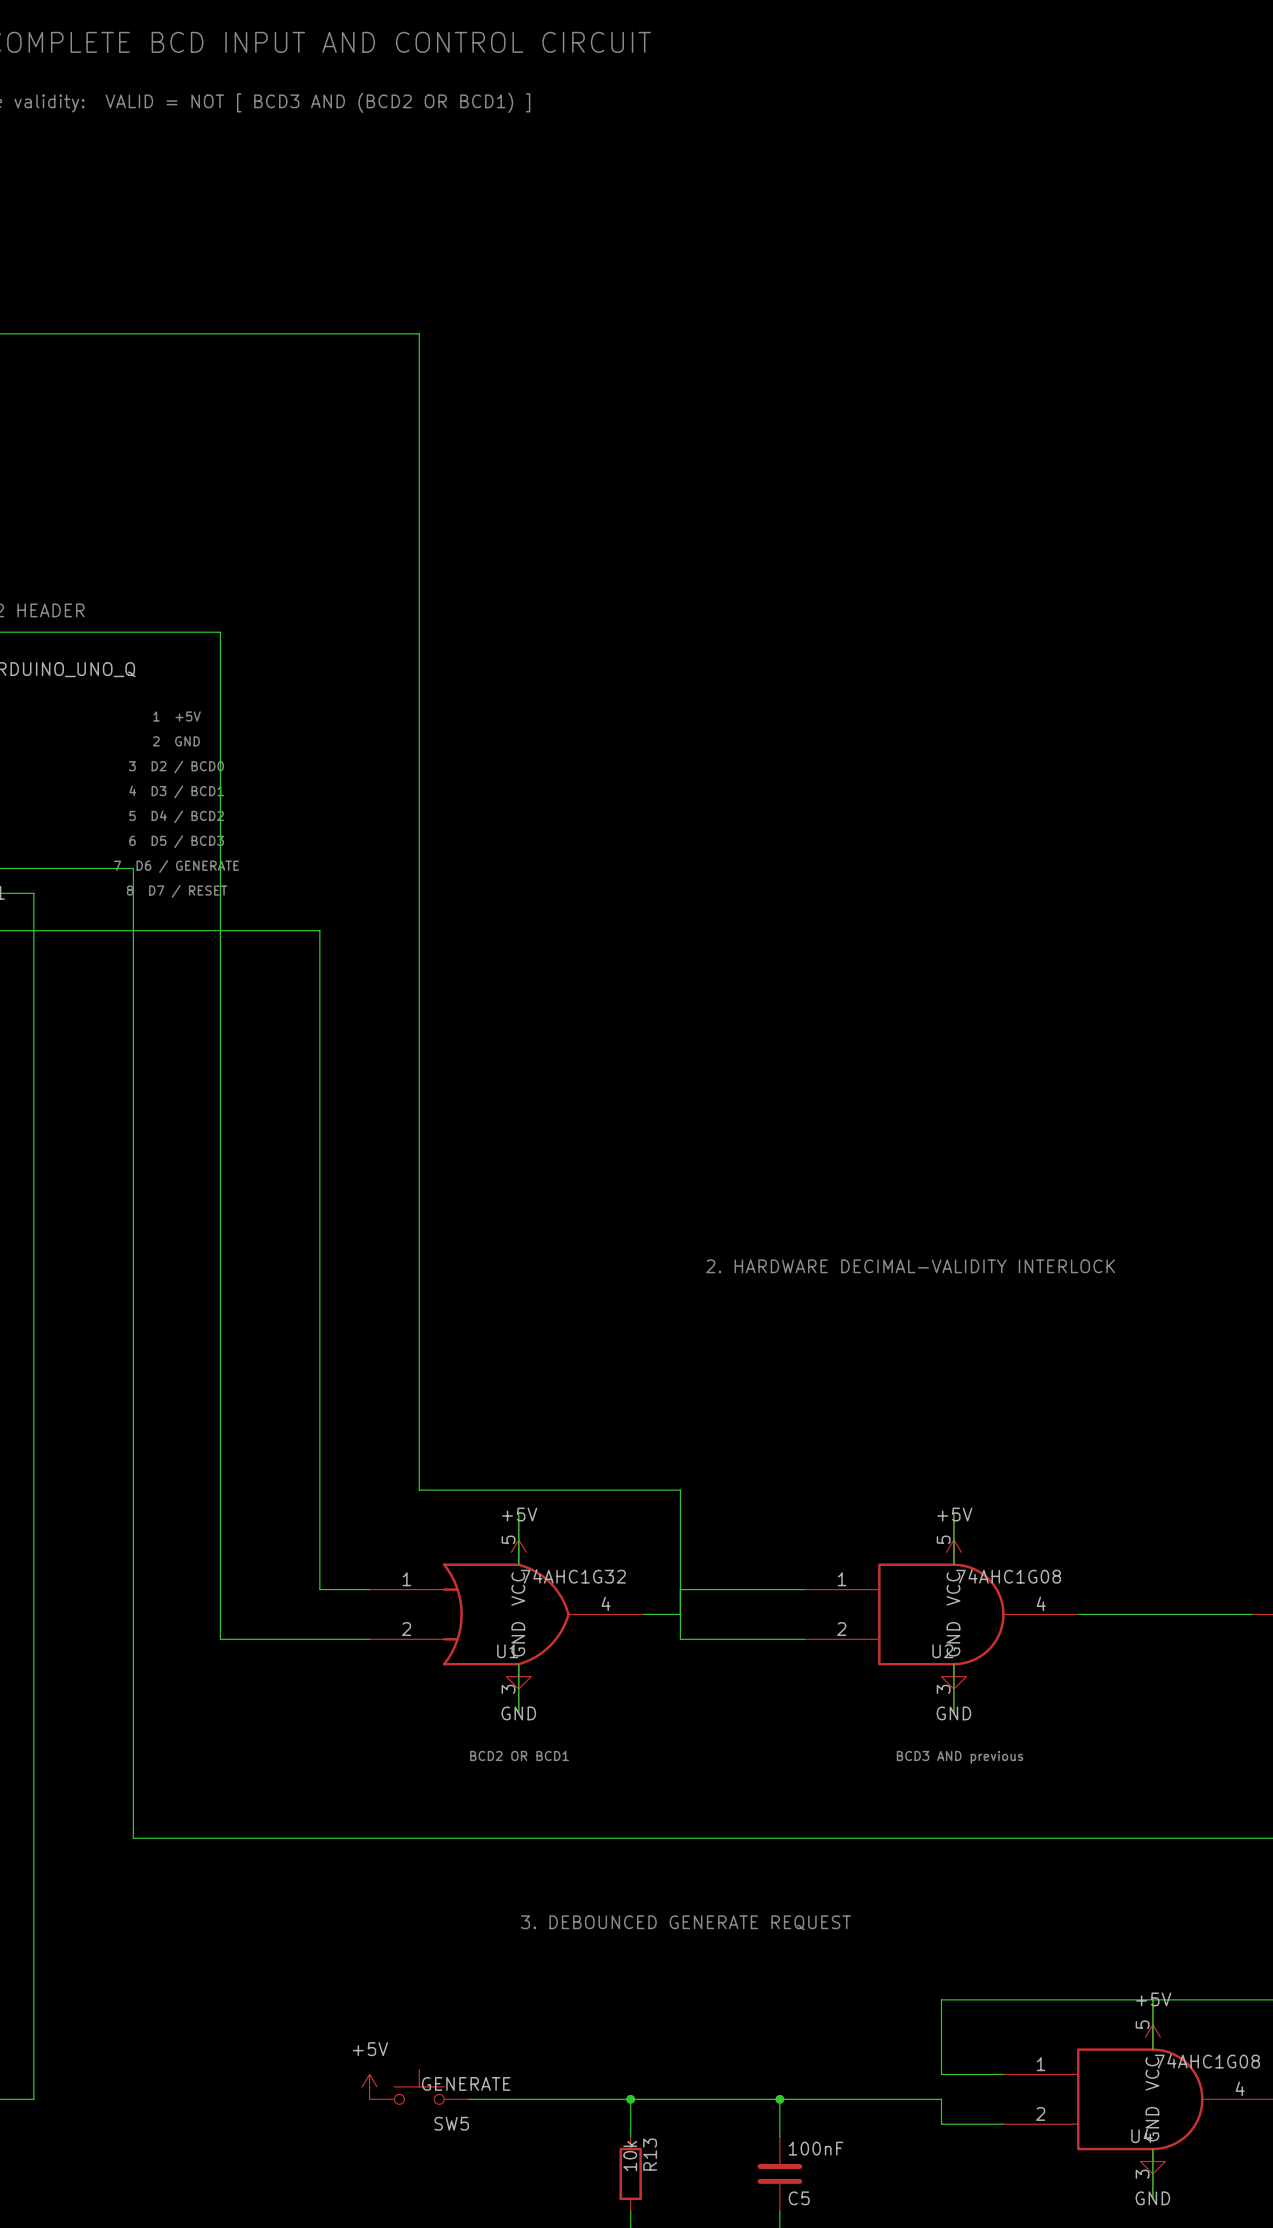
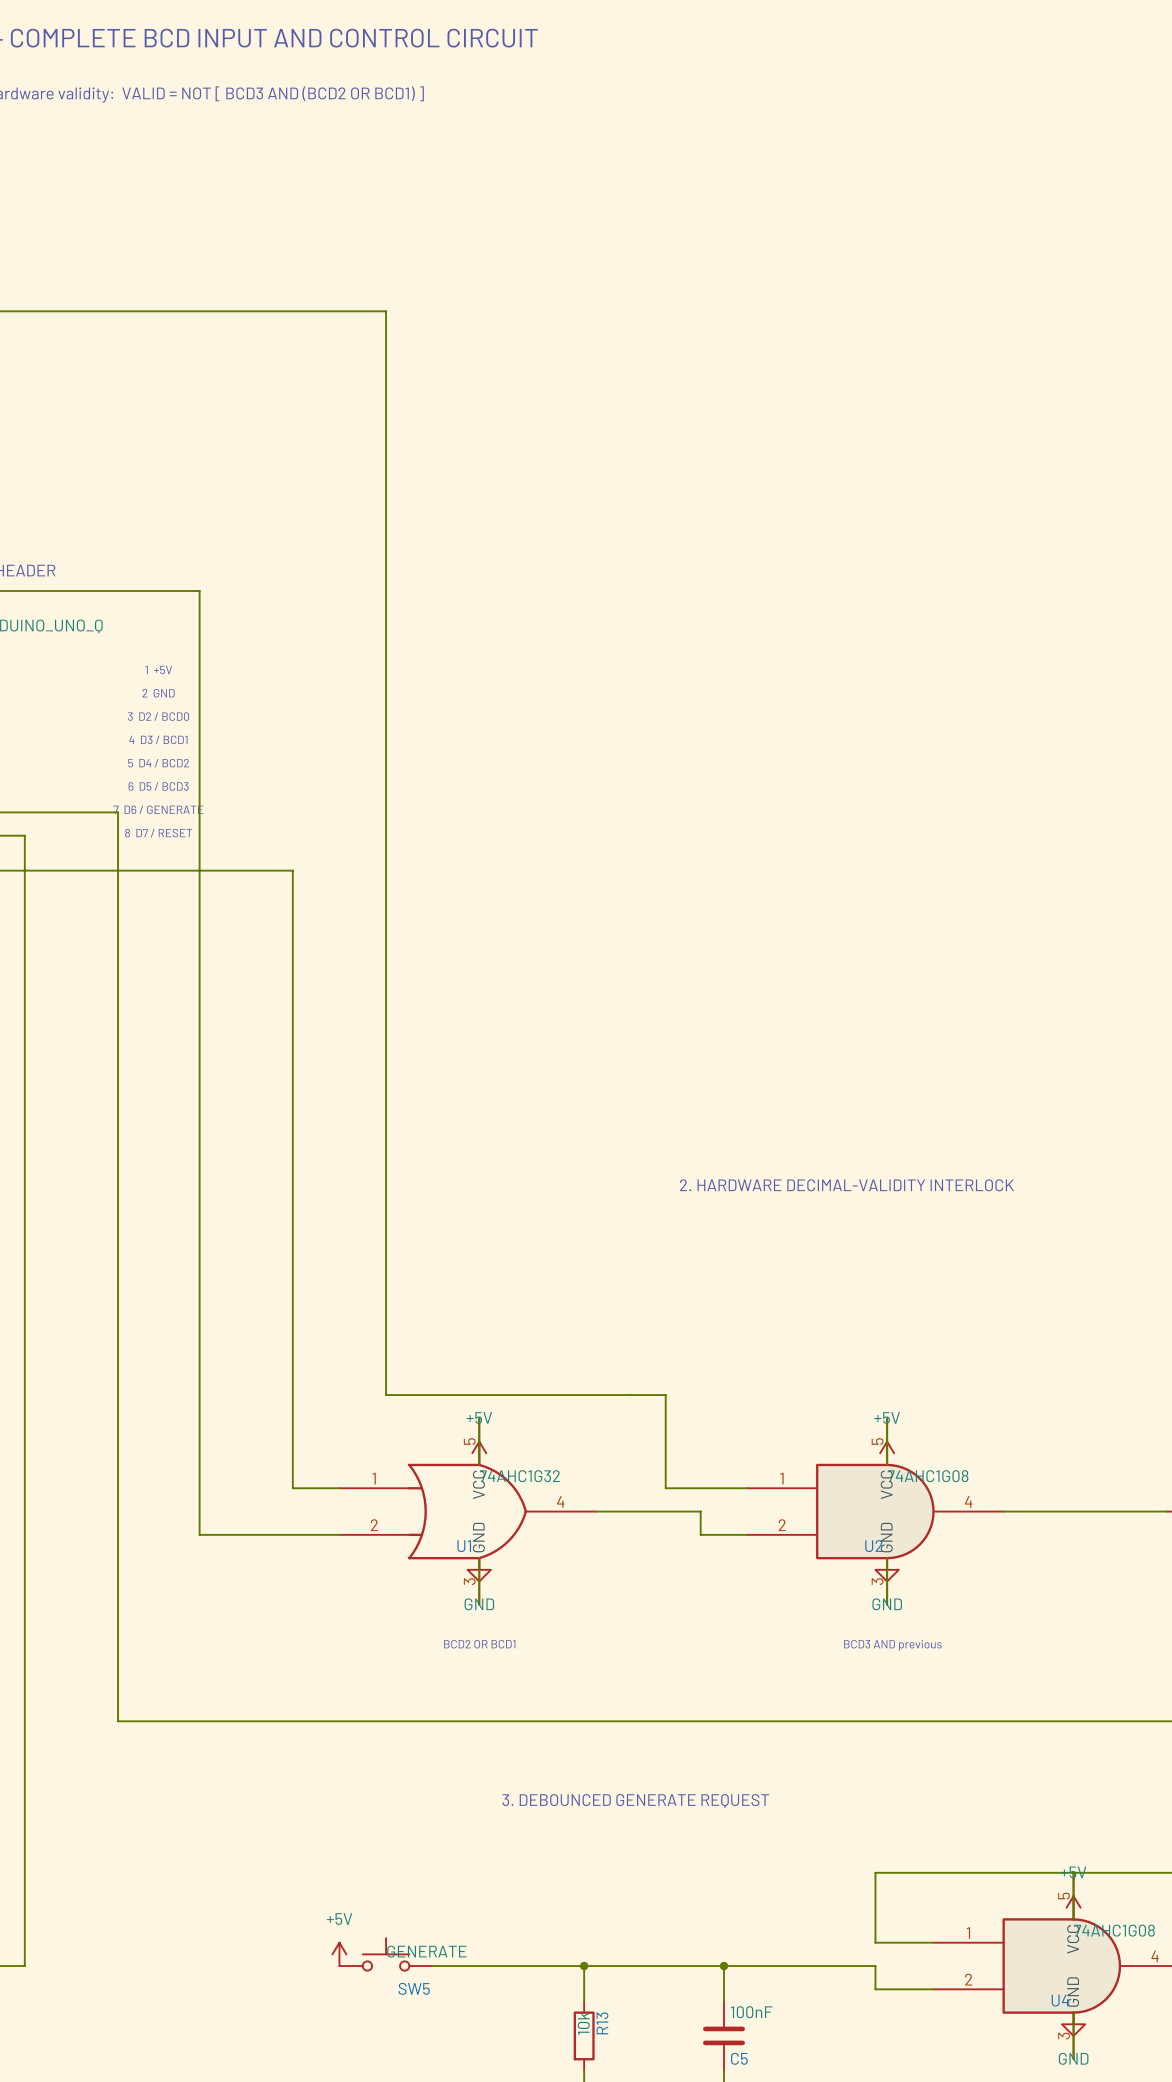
wire: (680, 1490) (680, 1639) (755, 1639) -> (630, 1395) (665, 1395) (665, 1488)
wire: (680, 1589) (717, 1589) -> none
wire: none -> (630, 1511) (700, 1511) (700, 1534)

